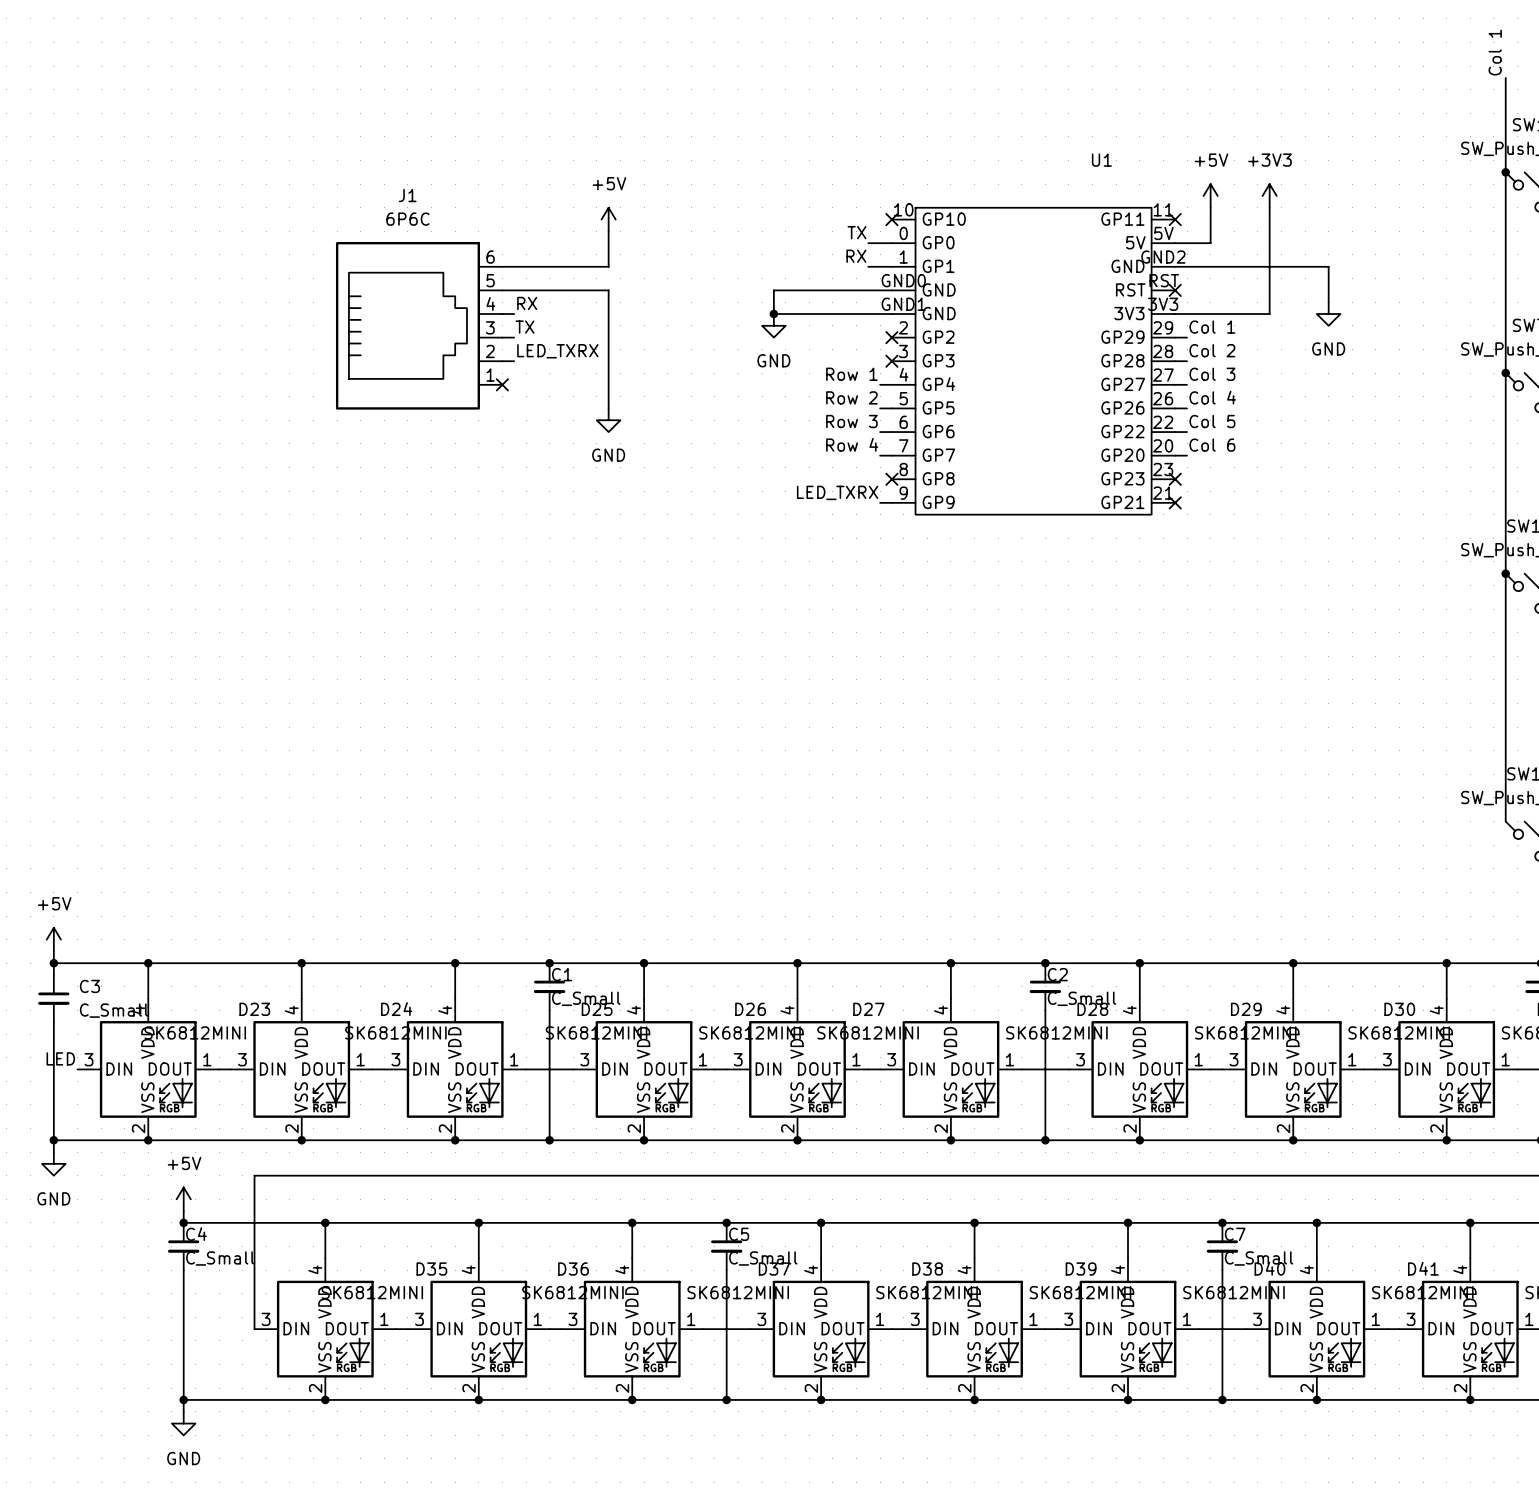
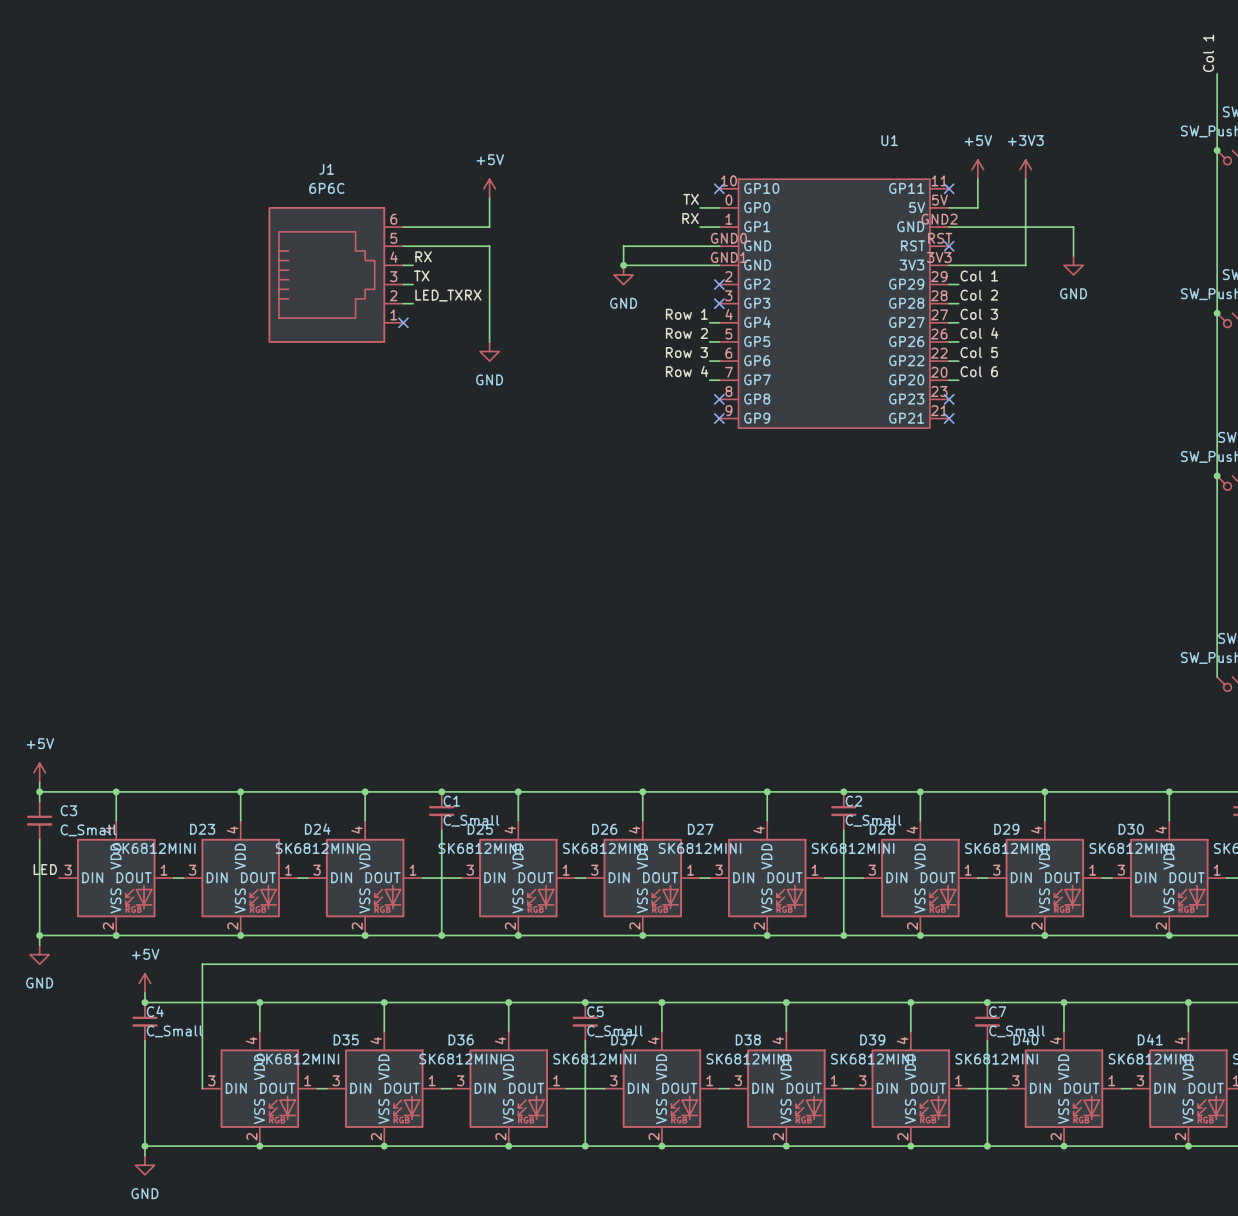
label: LED_TXRX (837, 492) -> none
wire: (880, 502) (891, 502) -> none
no-connect mark: none -> (719, 418)

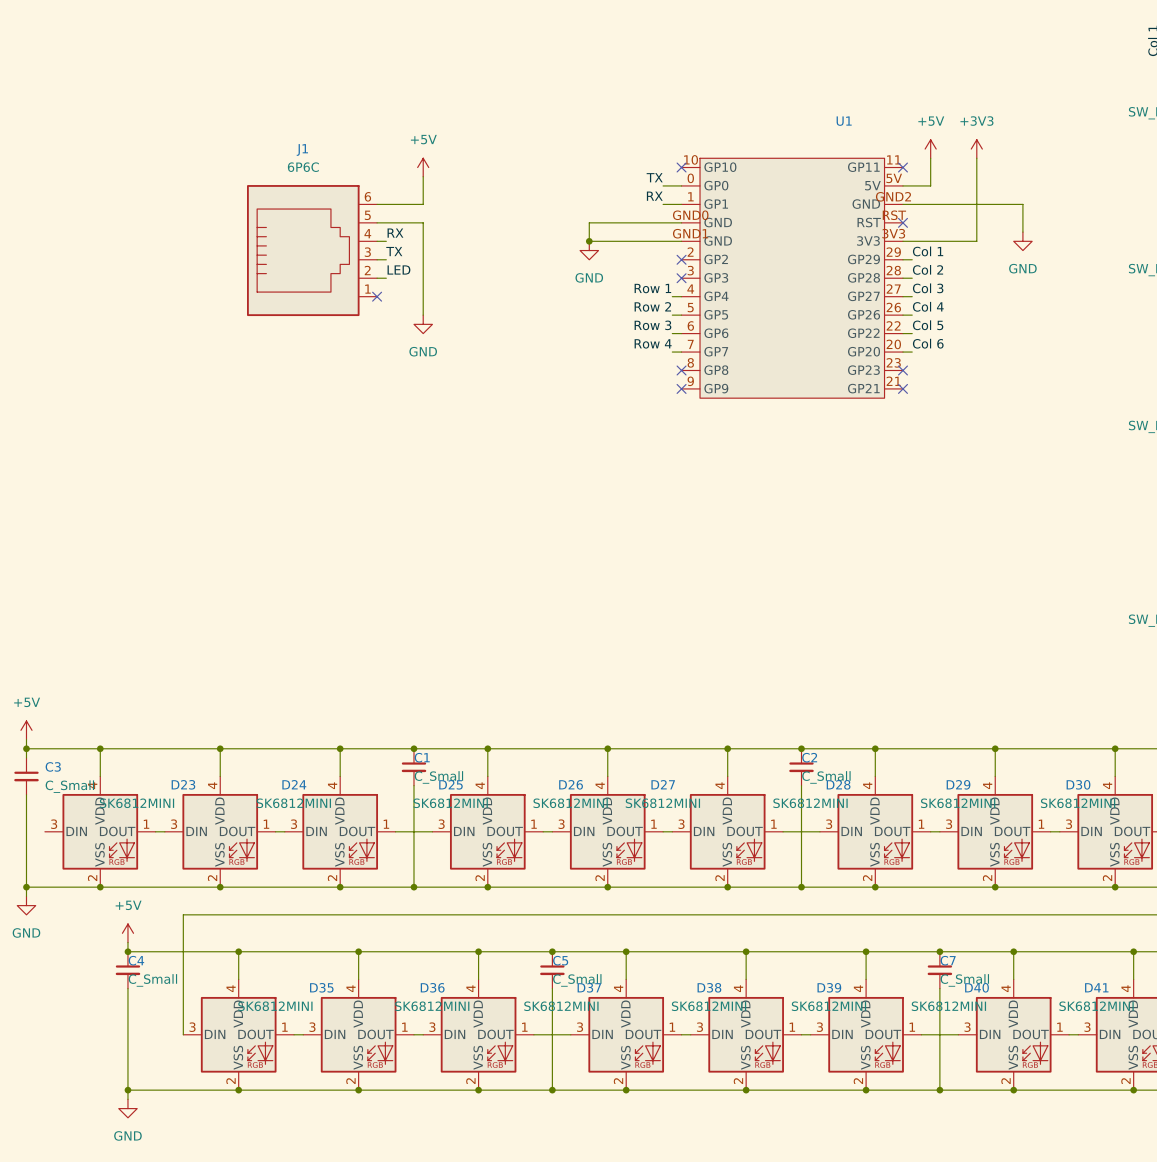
power symbol position: +5V (489, 188) -> +5V (423, 167)
wire: (489, 198) (489, 227) (451, 227) -> (423, 176) (423, 204)
wire: (451, 246) (489, 246) (489, 341) -> (423, 222) (423, 315)
label: LED_TXRX (448, 295) -> LED (398, 269)
power symbol position: GND (489, 351) -> GND (423, 324)
label: LED (45, 869) -> none

